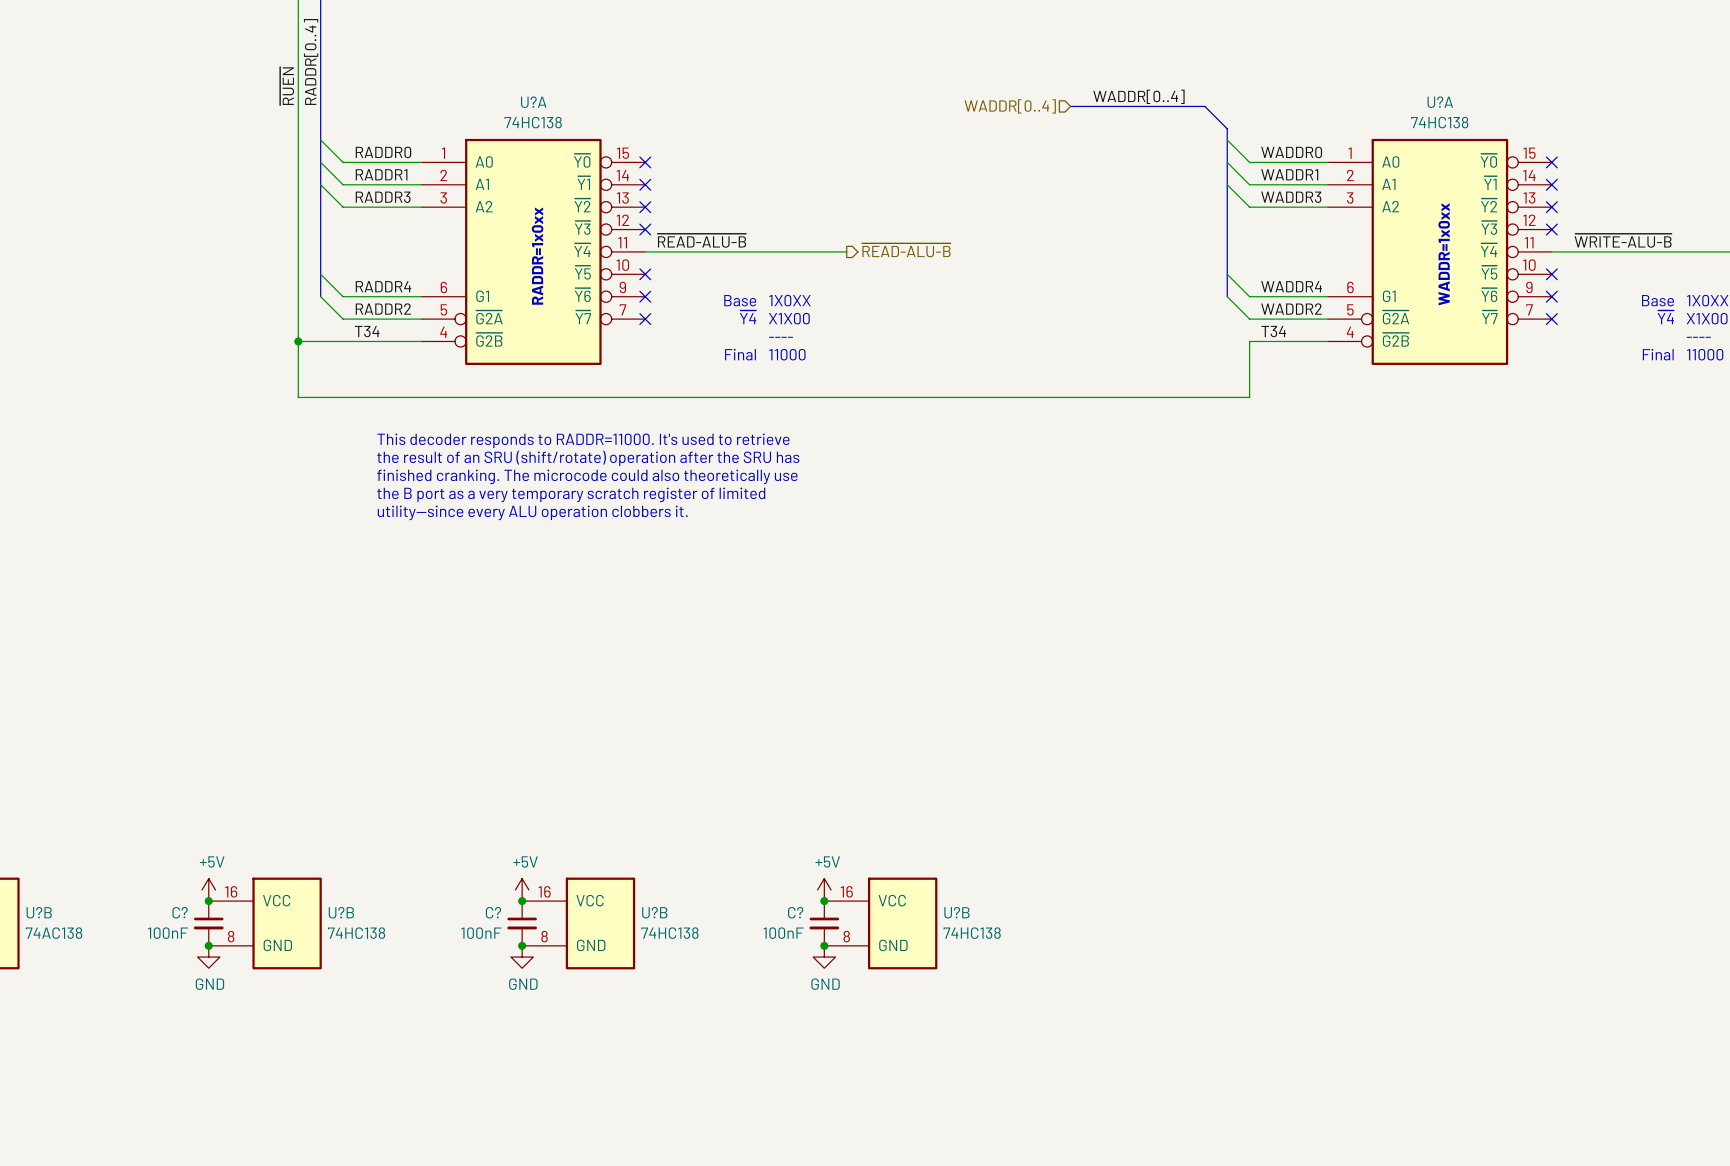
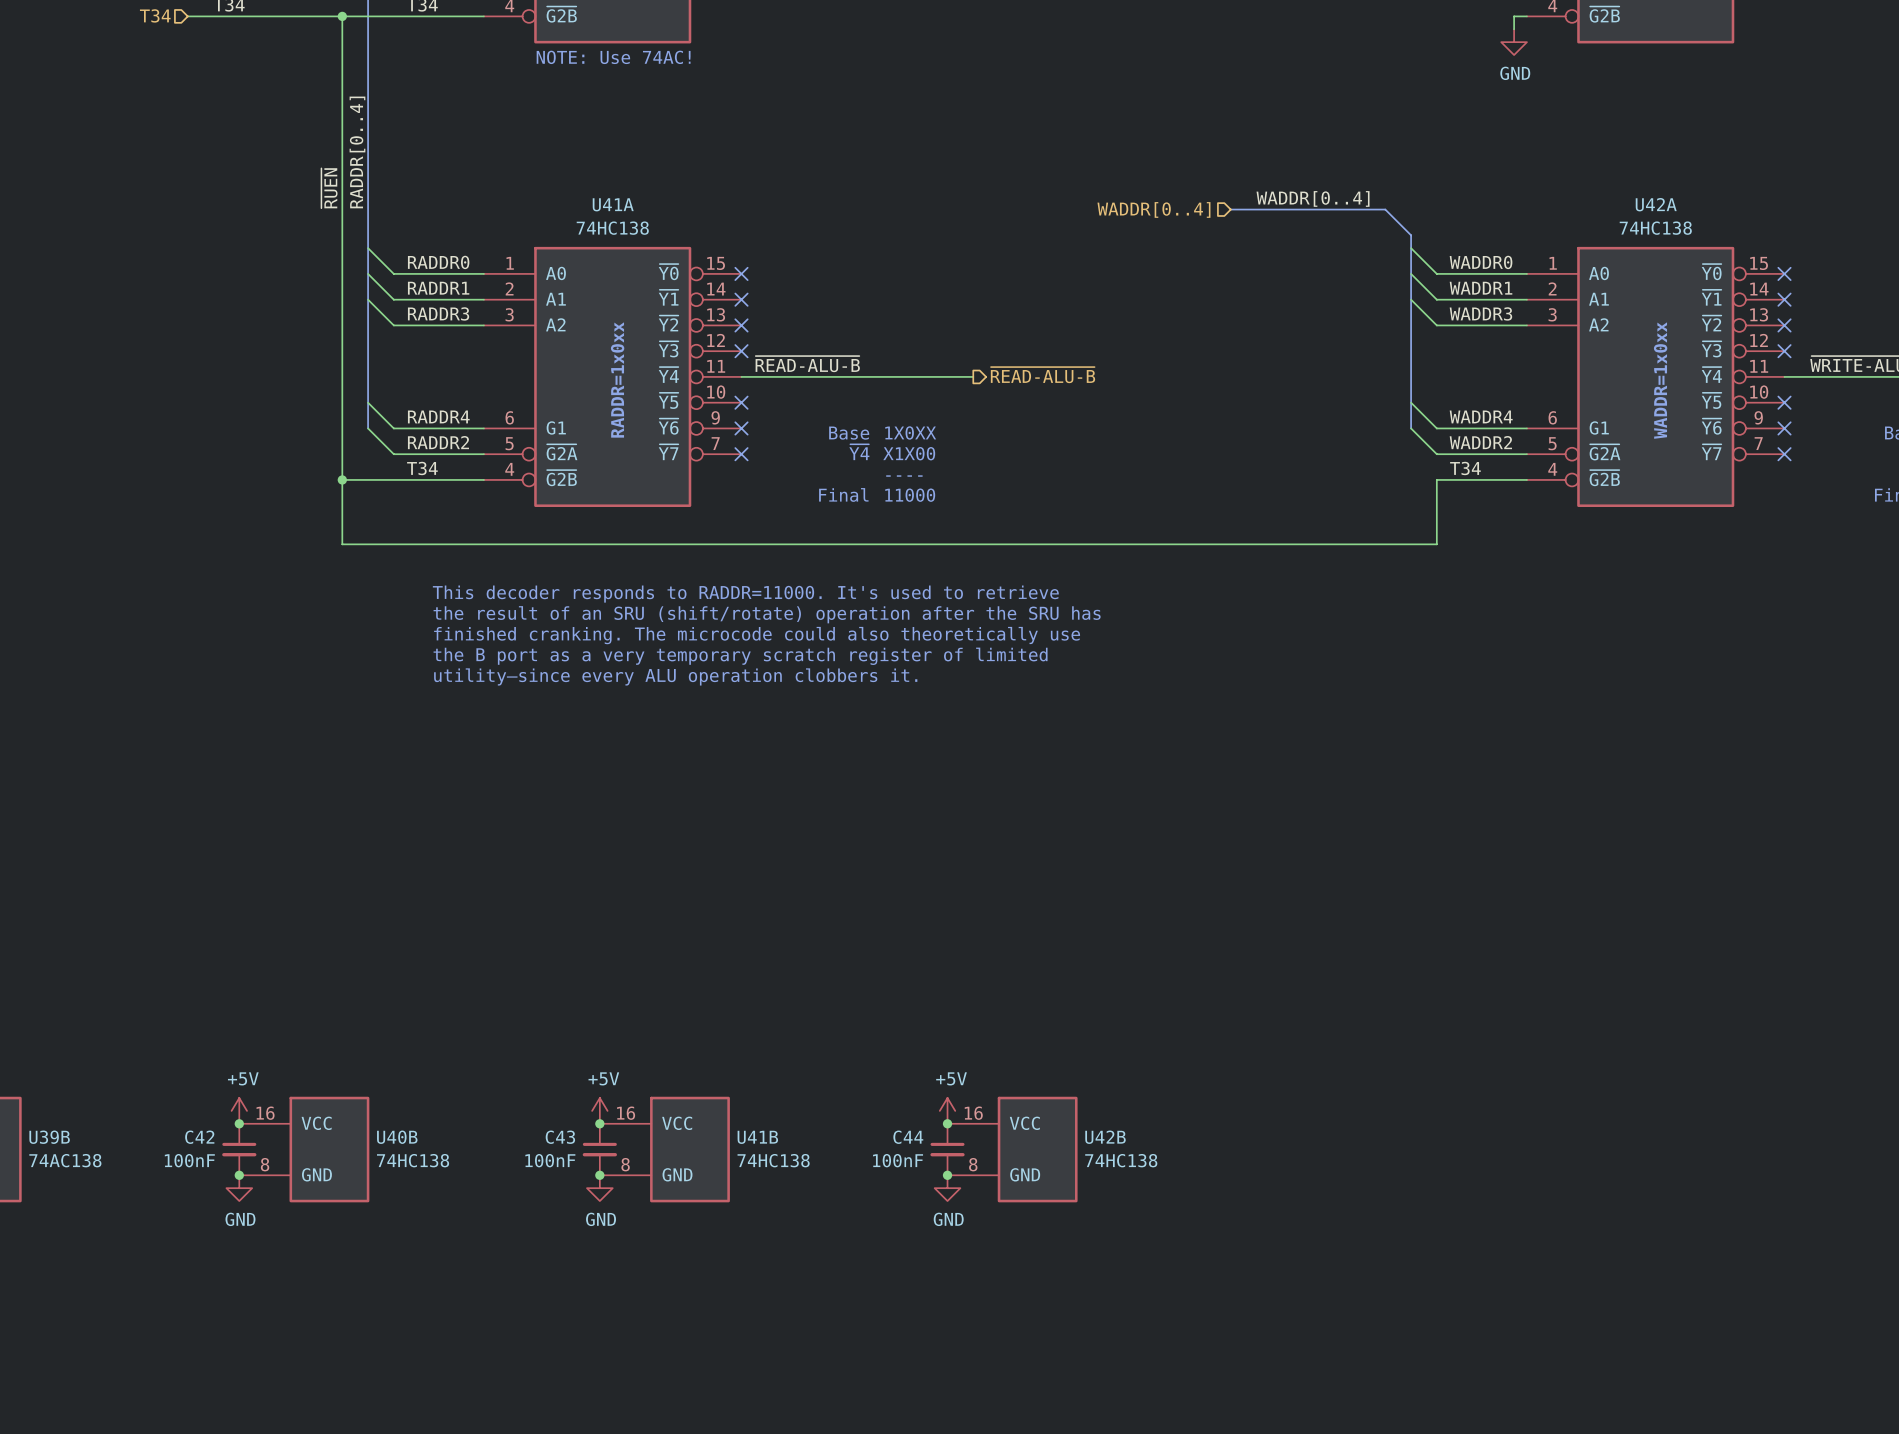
U?A name: U?A (533, 102) -> U41A (613, 204)
U?A name: U?A (1440, 102) -> U42A (1656, 204)
U?B name: U?B (39, 912) -> U39B (49, 1137)
C? name: C? (180, 912) -> C42 (199, 1137)
U?B name: U?B (341, 912) -> U40B (397, 1137)
C? name: C? (493, 912) -> C43 (560, 1137)
U?B name: U?B (654, 912) -> U41B (757, 1137)
C? name: C? (795, 912) -> C44 (908, 1137)
U?B name: U?B (956, 912) -> U42B (1105, 1137)

